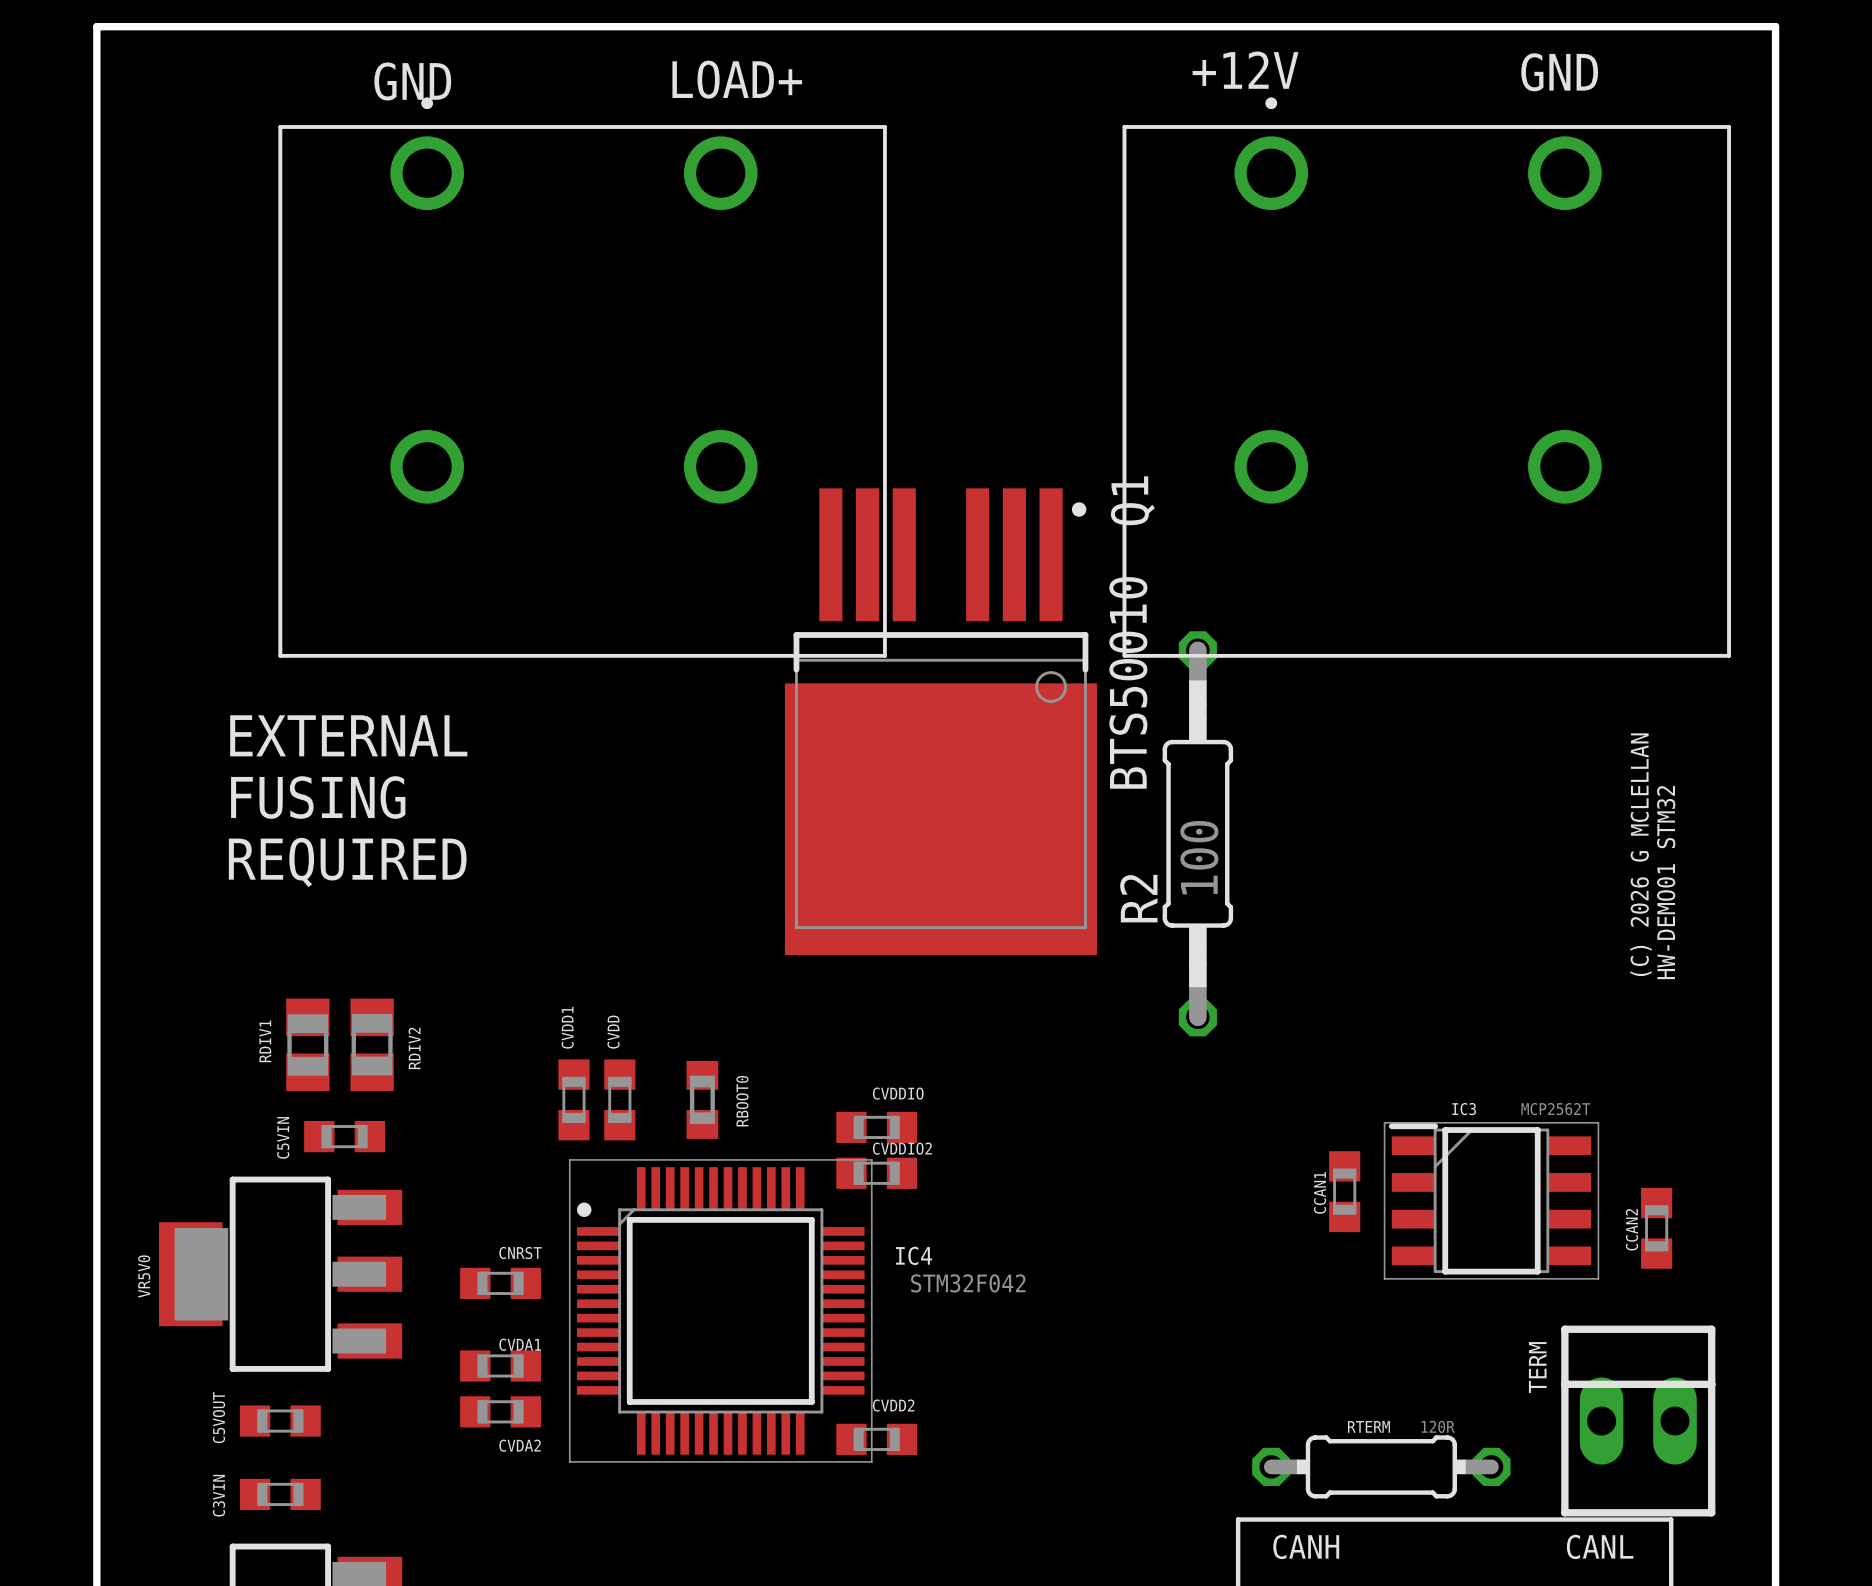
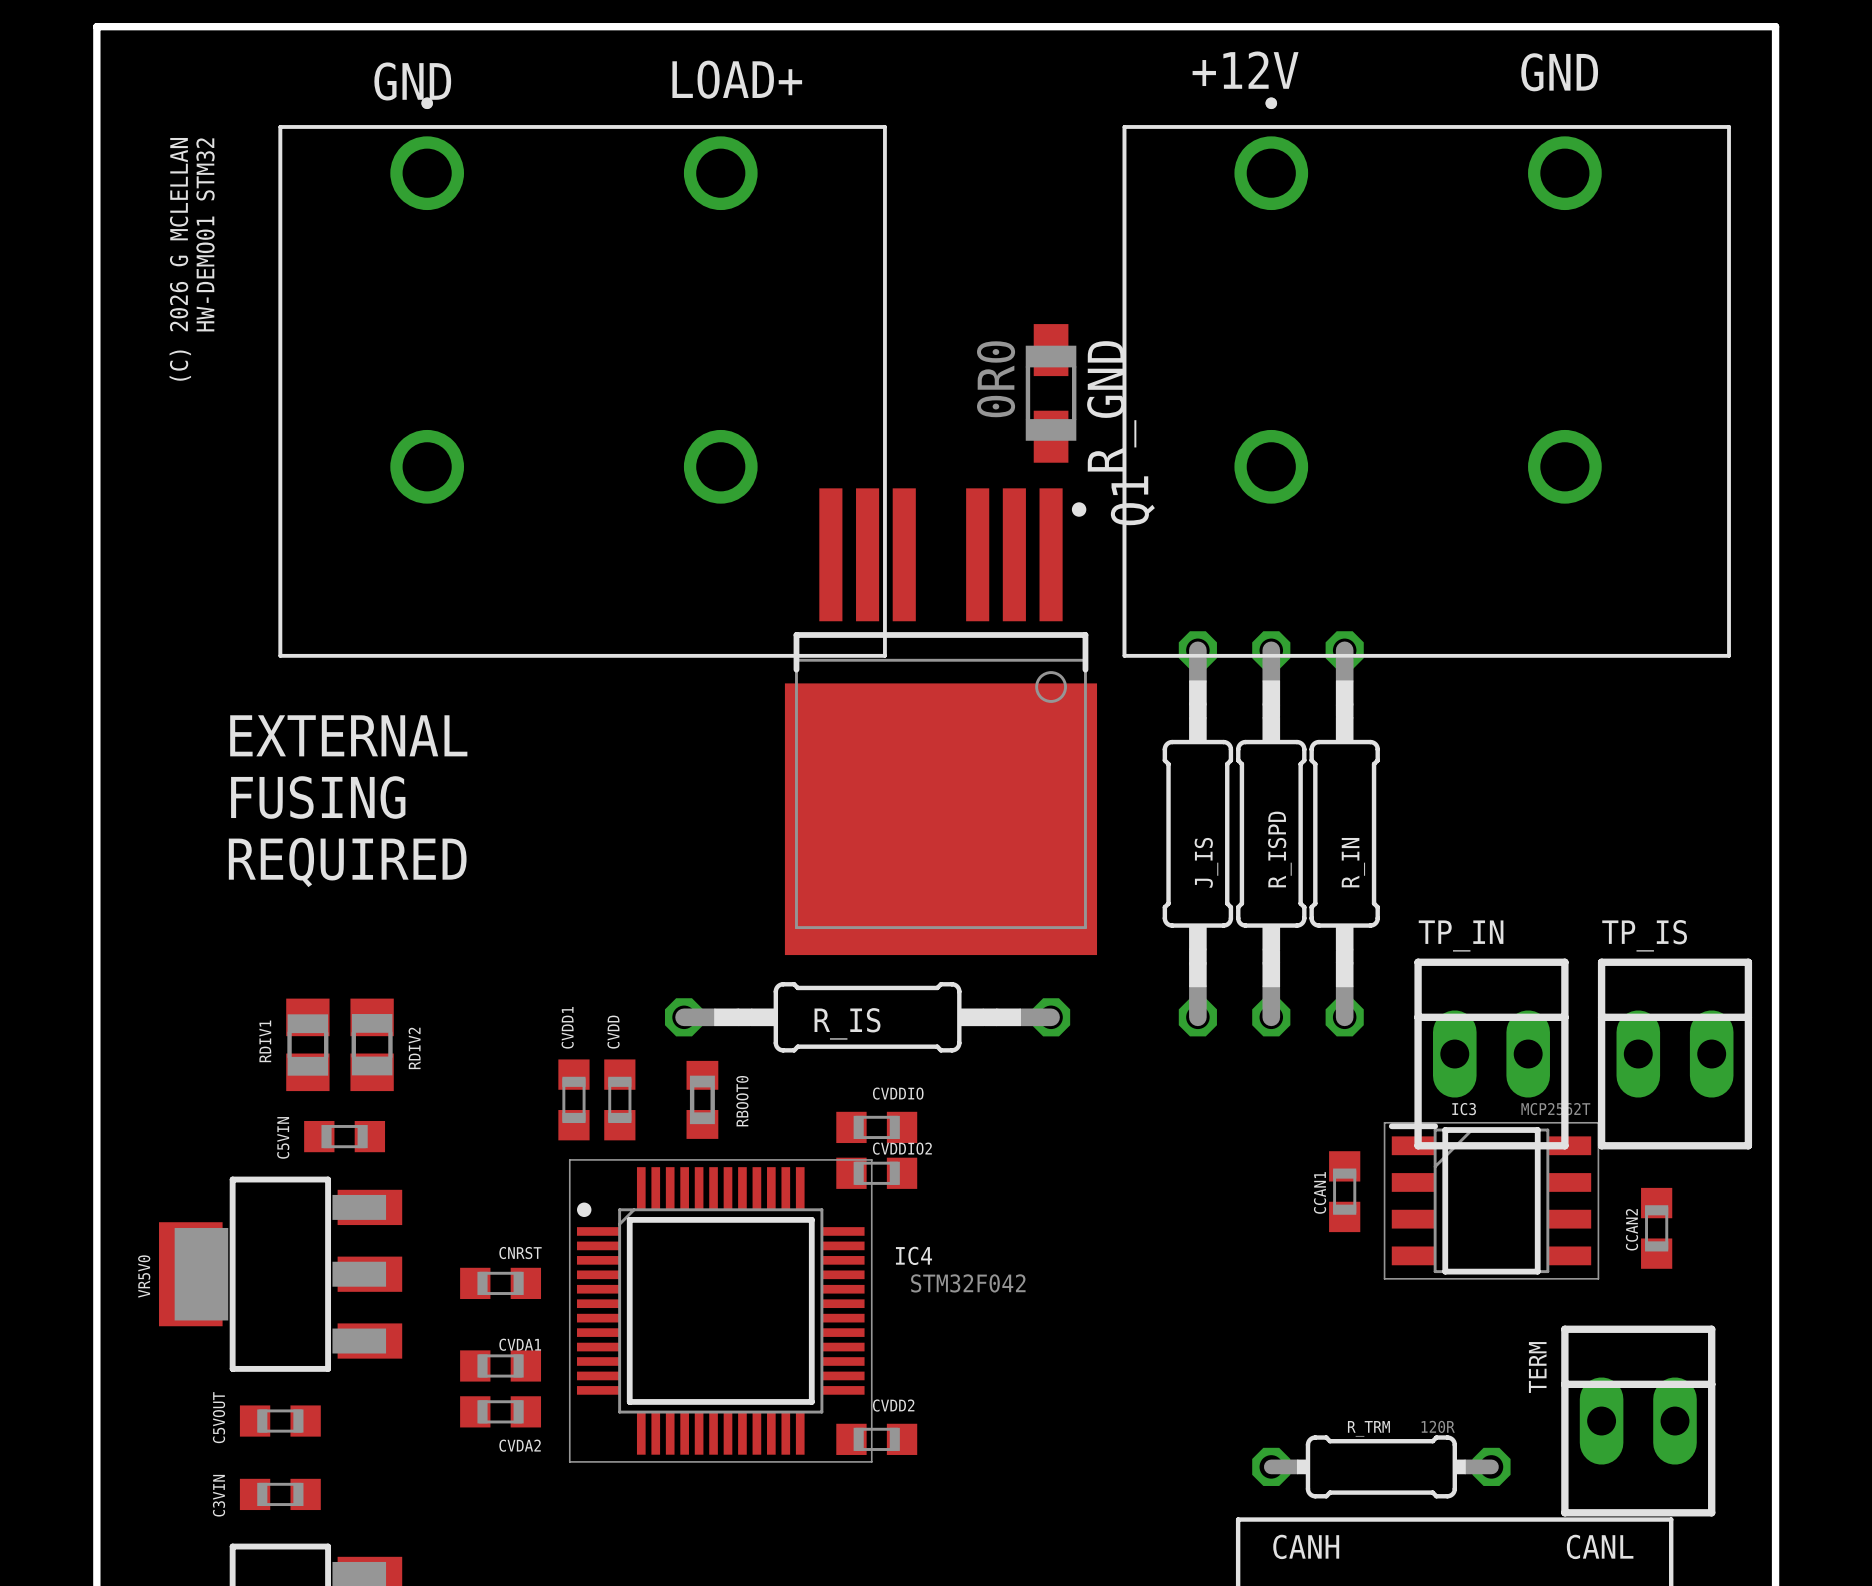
text: none -> HW-DEMO01 STM32 (205, 234)
text: none -> (C) 2026 G MCLELLAN (180, 259)
R_GND: none -> 0R0 (1051, 393)
Q1 value: BTS50010 (1128, 682) -> none
R_IN: none -> (1271, 833)
R_ISPD: none -> (1344, 833)
text: (C) 2026 G MCLELLAN (1640, 854) -> none
R2 value: 100 (1199, 857) -> none
text: HW-DEMO01 STM32 (1666, 882) -> none
R2 name: R2 (1138, 898) -> J_IS (1206, 862)
R_IS: none -> (867, 1017)
TP_IN: none -> (1491, 1054)
TP_IS: none -> (1674, 1054)
RTERM name: RTERM (1368, 1426) -> R_TRM (1368, 1428)

